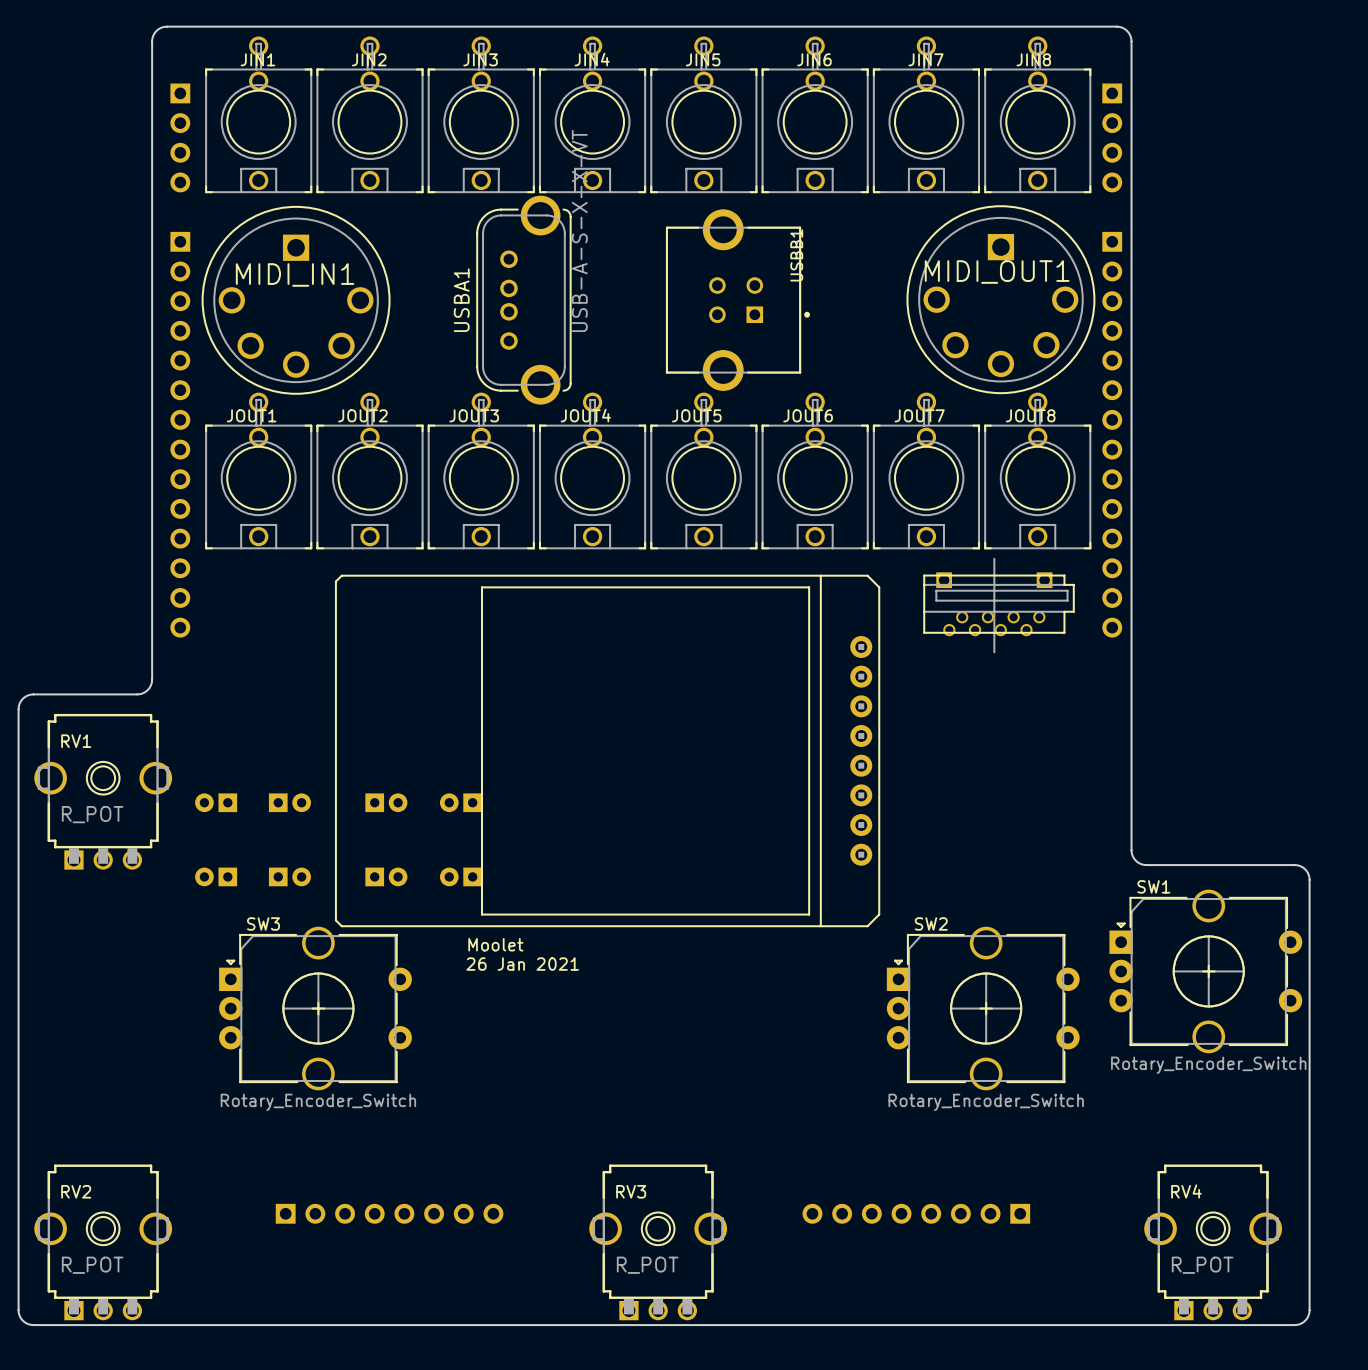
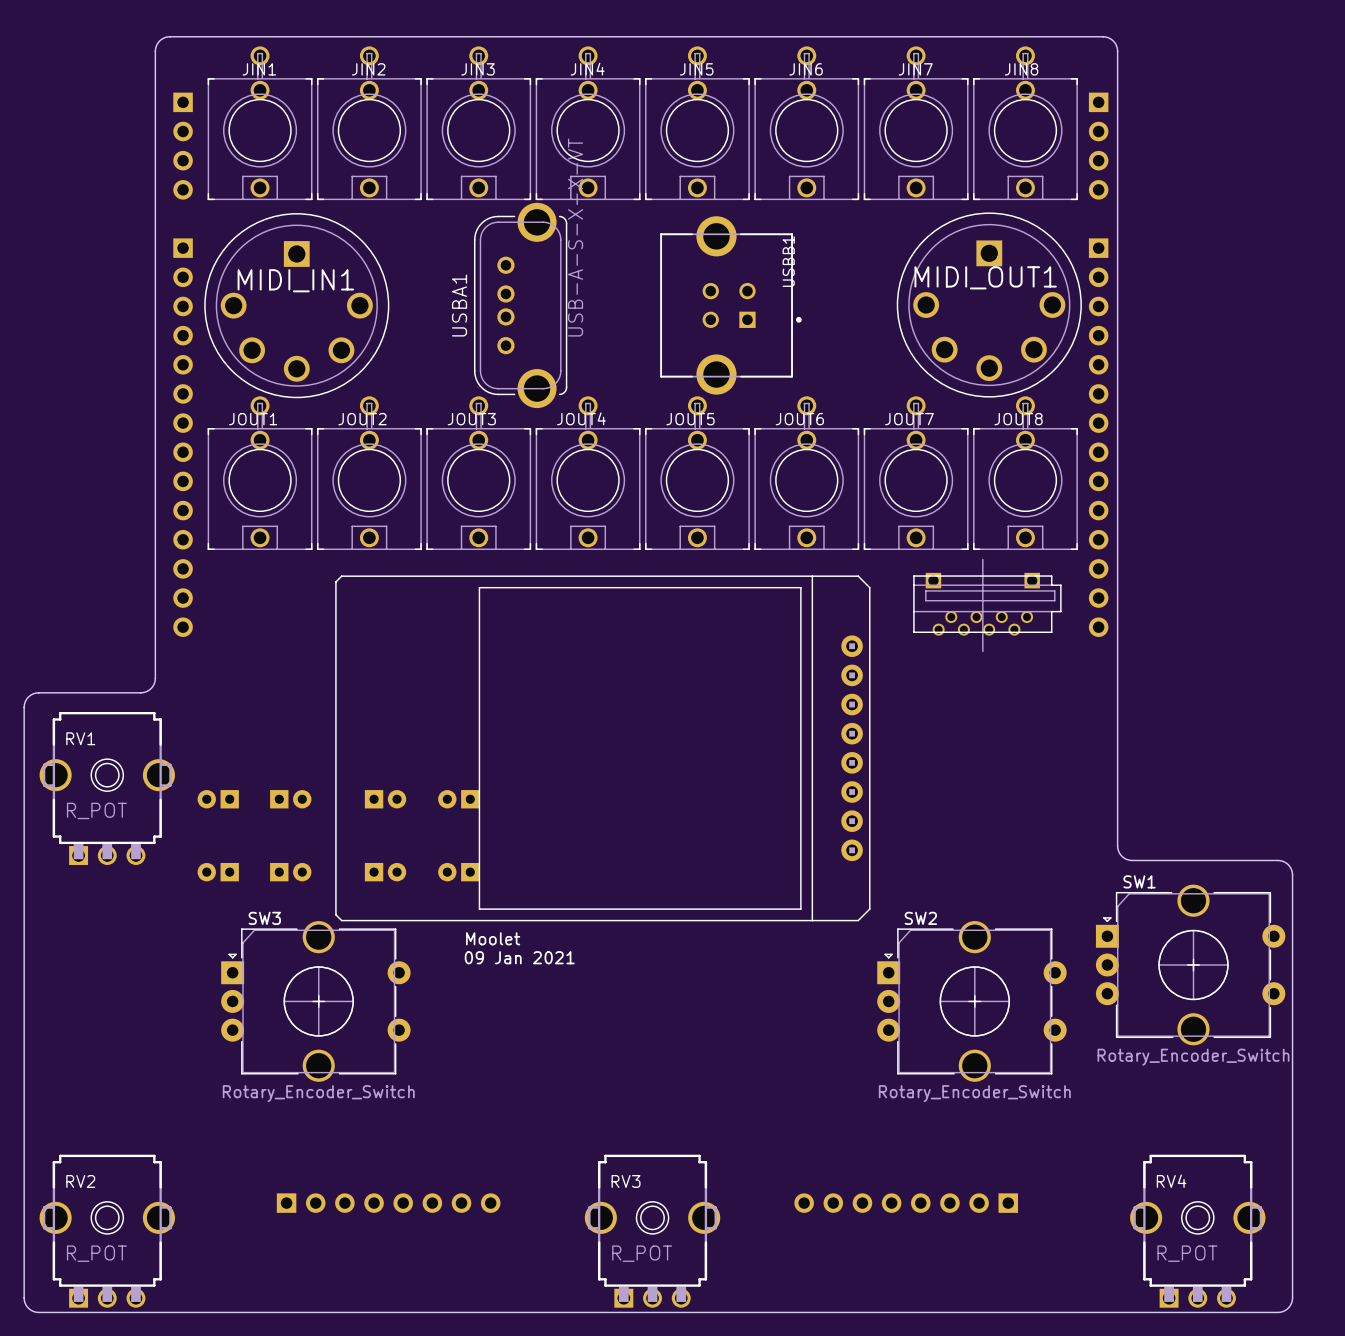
text: 26 Jan 2021 (522, 964) -> 09 Jan 2021 (519, 957)

